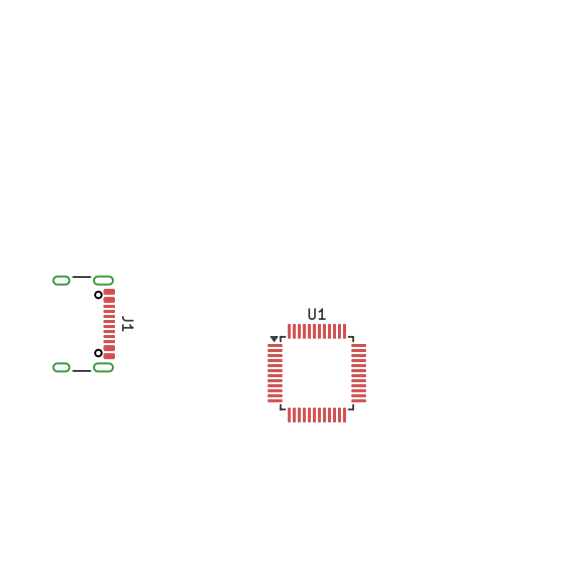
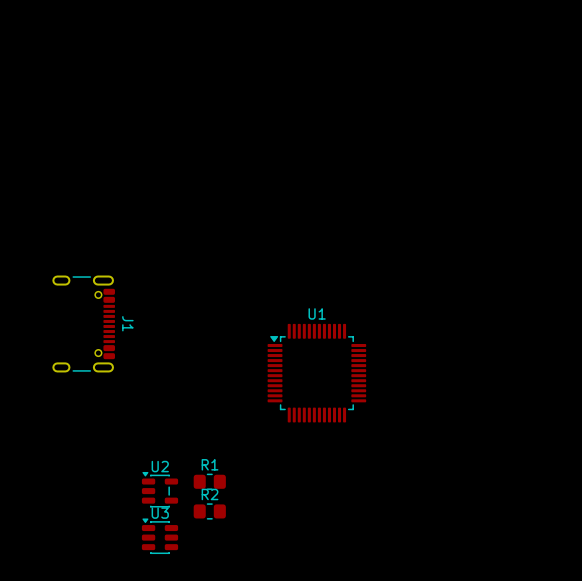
R1: none -> (209, 481)
U2: none -> (160, 489)
R2: none -> (209, 511)
U3: none -> (160, 536)

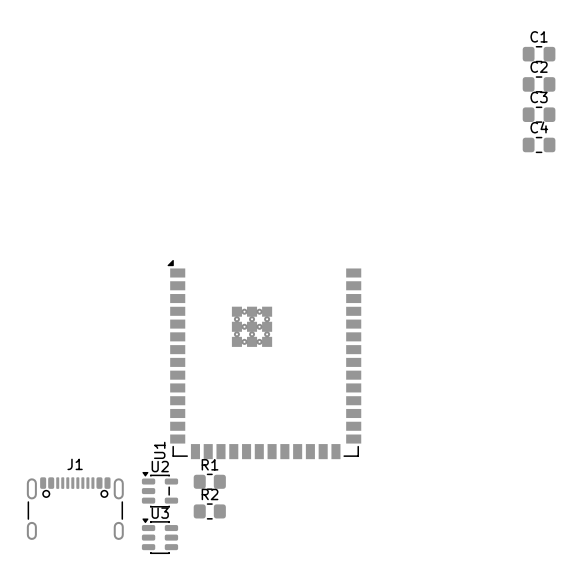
C1: none -> (539, 54)
C2: none -> (539, 84)
C3: none -> (539, 114)
C4: none -> (539, 144)
U1 name position: U1 (317, 313) -> U1 (159, 450)
J1 rotation: 0° (83, 323) -> 90° counterclockwise (75, 508)
J1 position: (83, 323) -> (75, 508)
U1 footprint: [267, 323, 367, 423] -> [167, 259, 362, 460]

